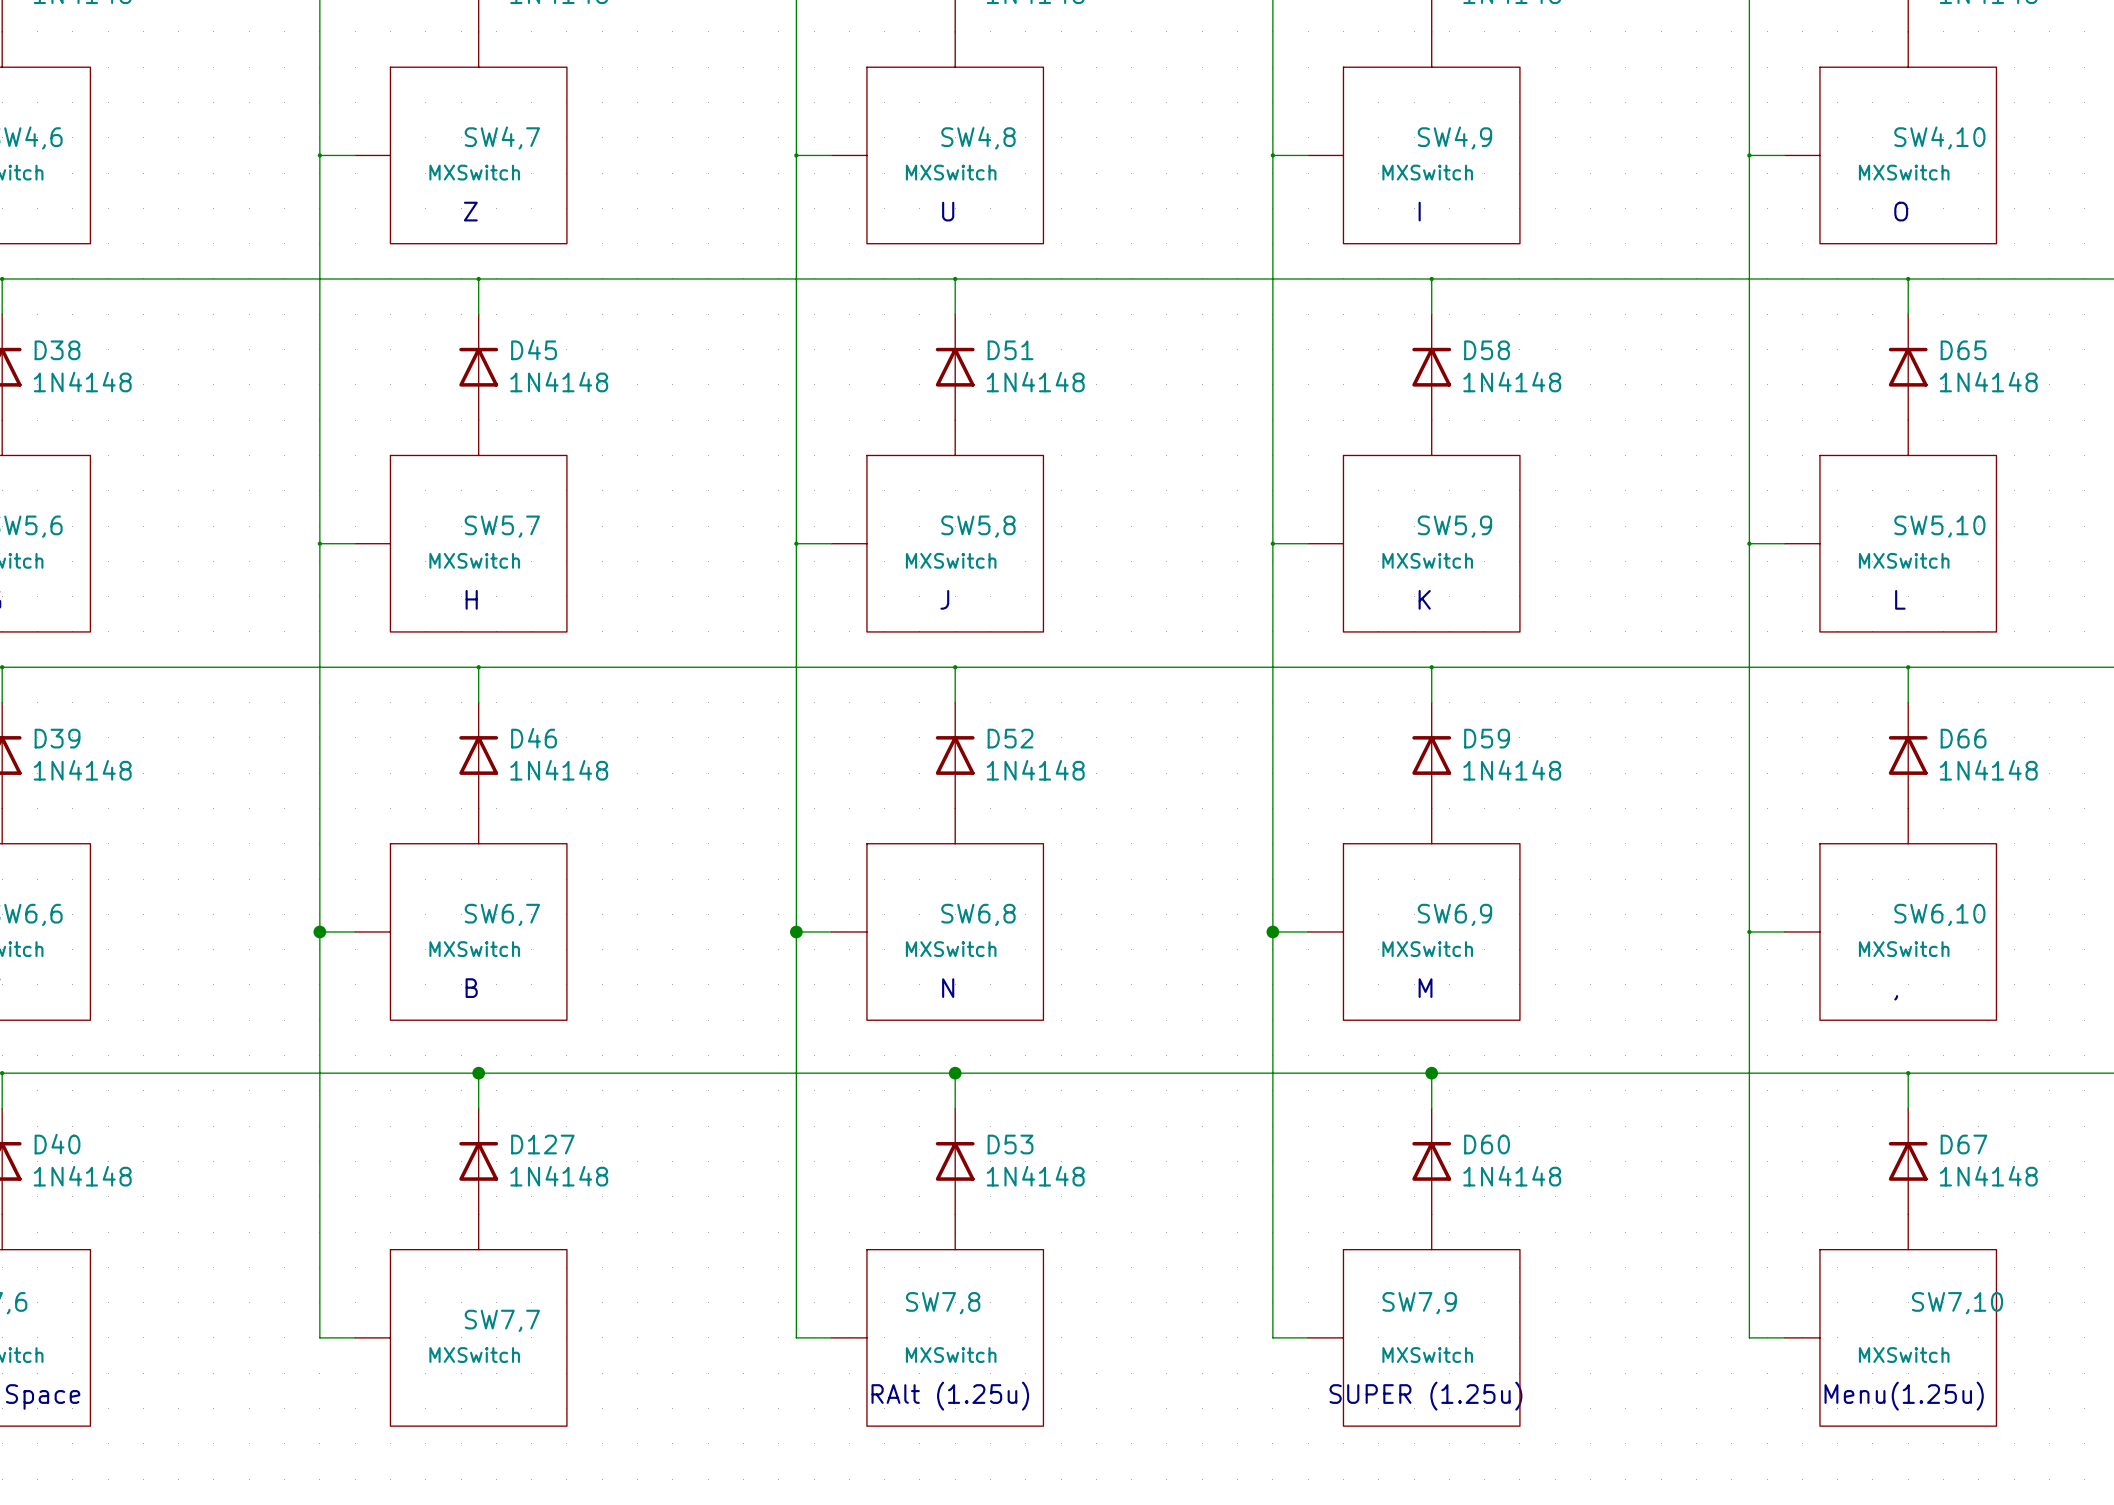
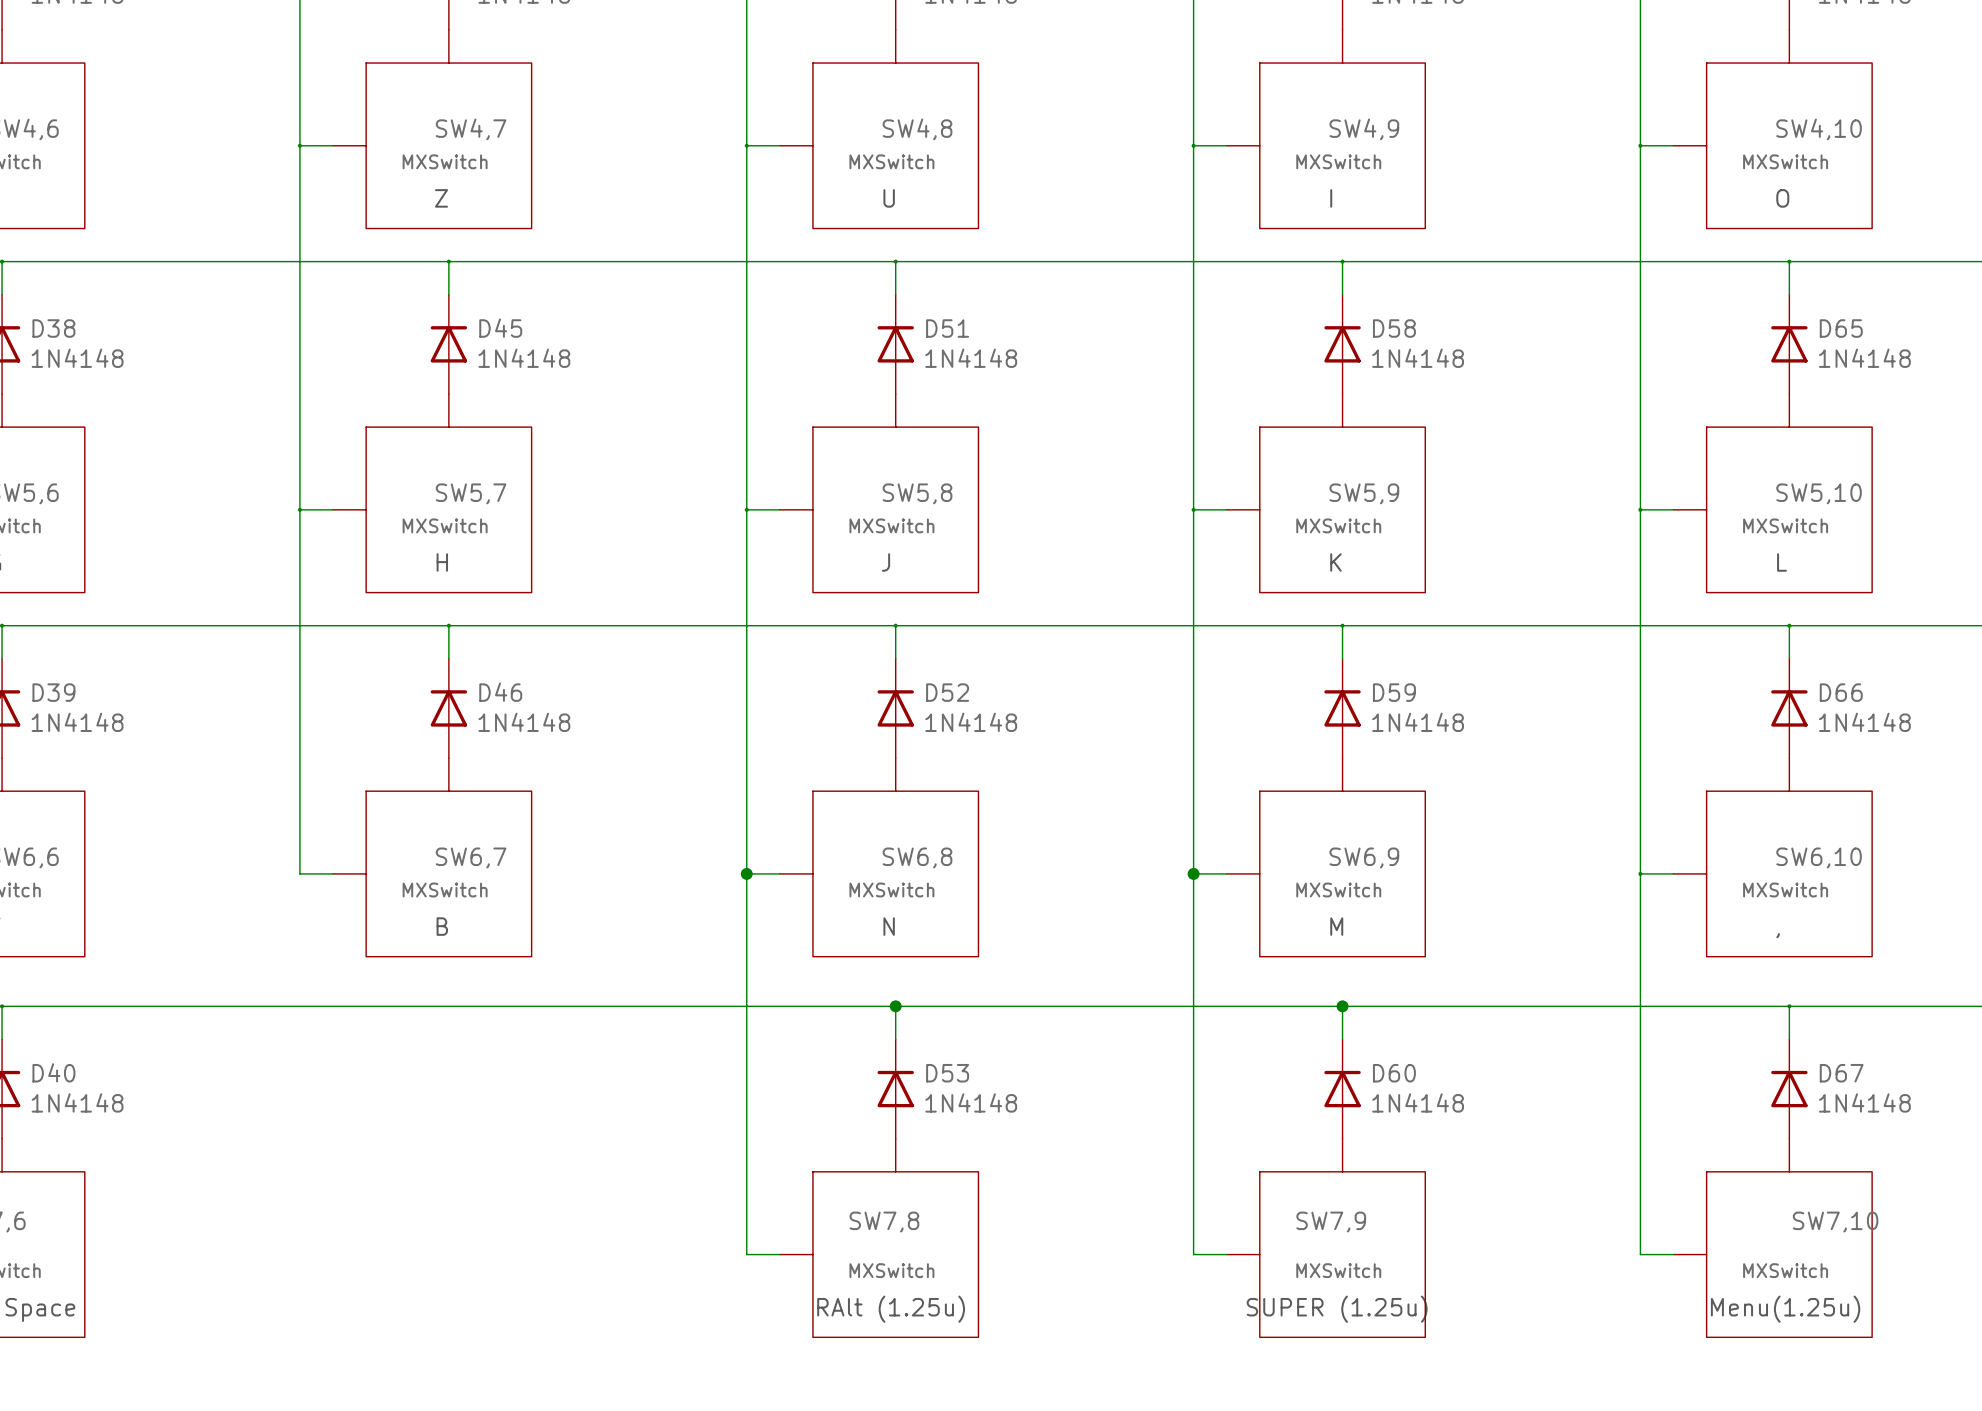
wire: (319, 931) (319, 1337) (355, 1337) -> none
junction: (319, 931) -> none
wire: (478, 1073) (478, 1108) -> none
junction: (478, 1073) -> none
D127: 1N4148 (478, 1161) -> none
SW7,7: MXSwitch (461, 1320) -> none

